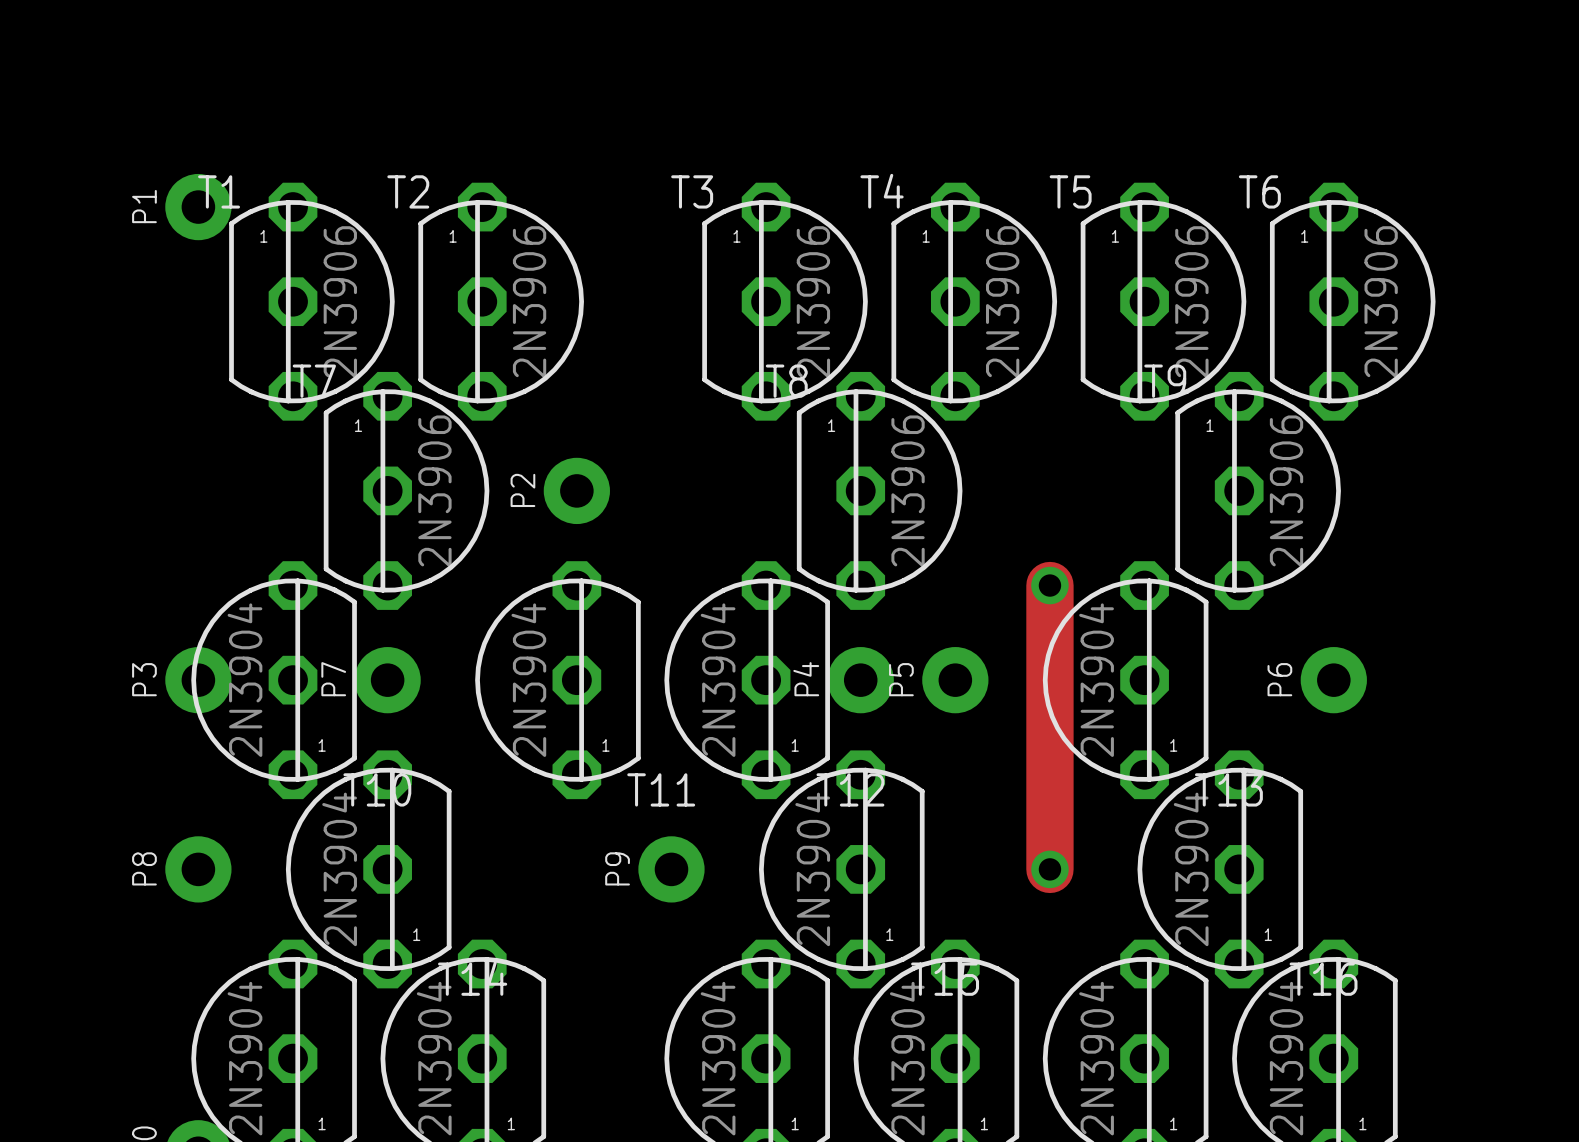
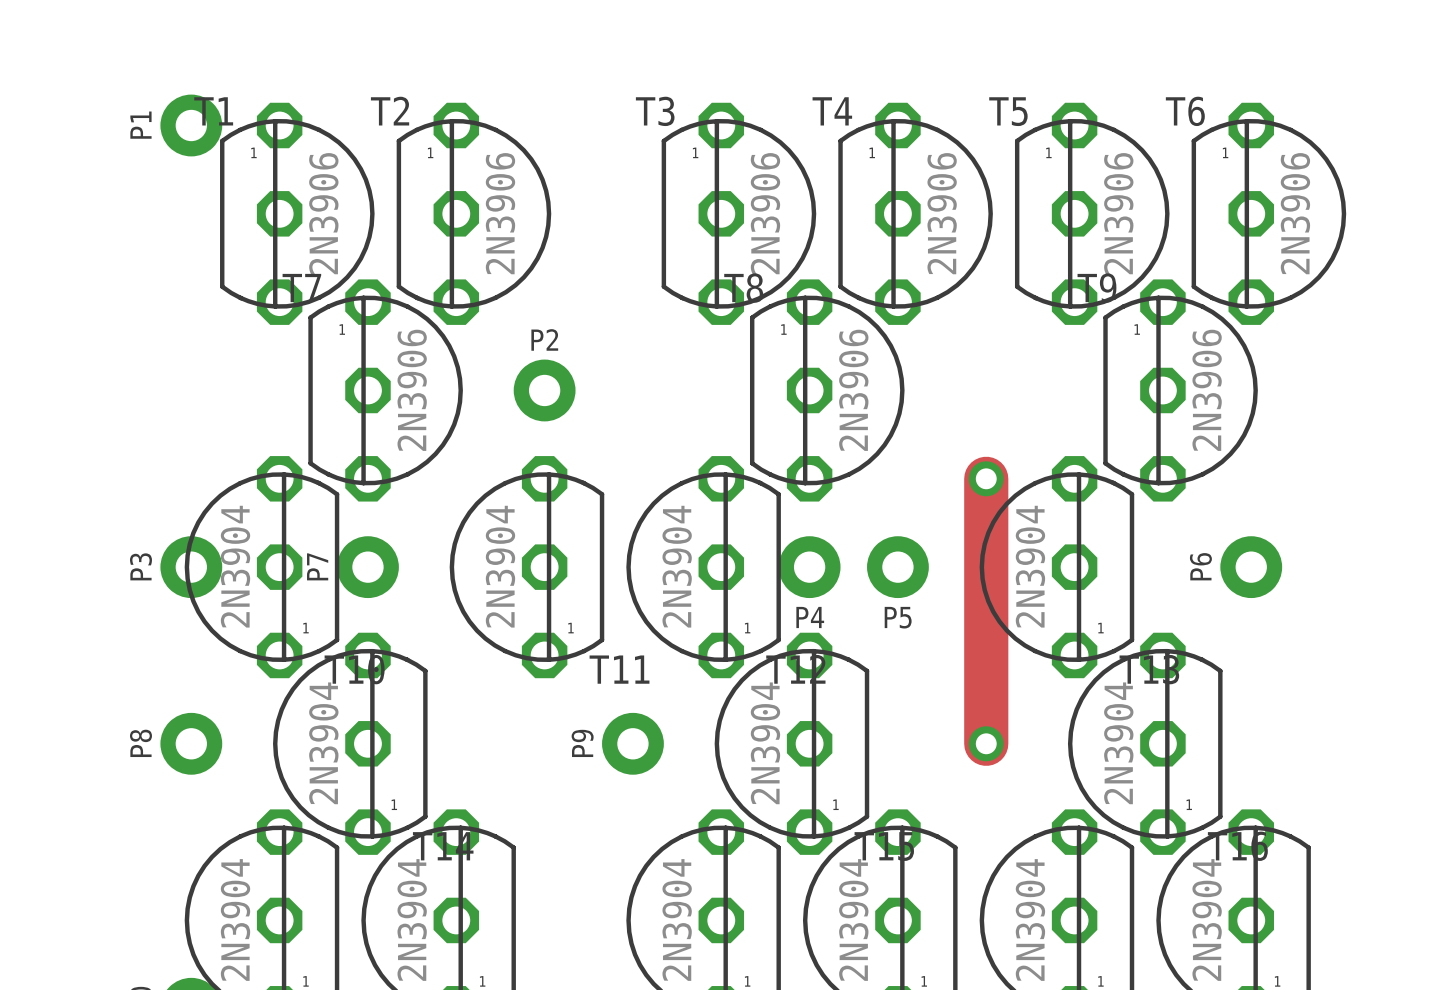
P2 name rotation: 0° (522, 490) -> 90° clockwise (544, 339)
P2 name position: P2 (522, 490) -> P2 (544, 339)
P4 name rotation: 0° (806, 679) -> 90° clockwise (810, 617)
P4 name position: P4 (806, 679) -> P4 (810, 617)
P5 name rotation: 0° (901, 679) -> 90° clockwise (898, 617)
P5 name position: P5 (901, 679) -> P5 (898, 617)

